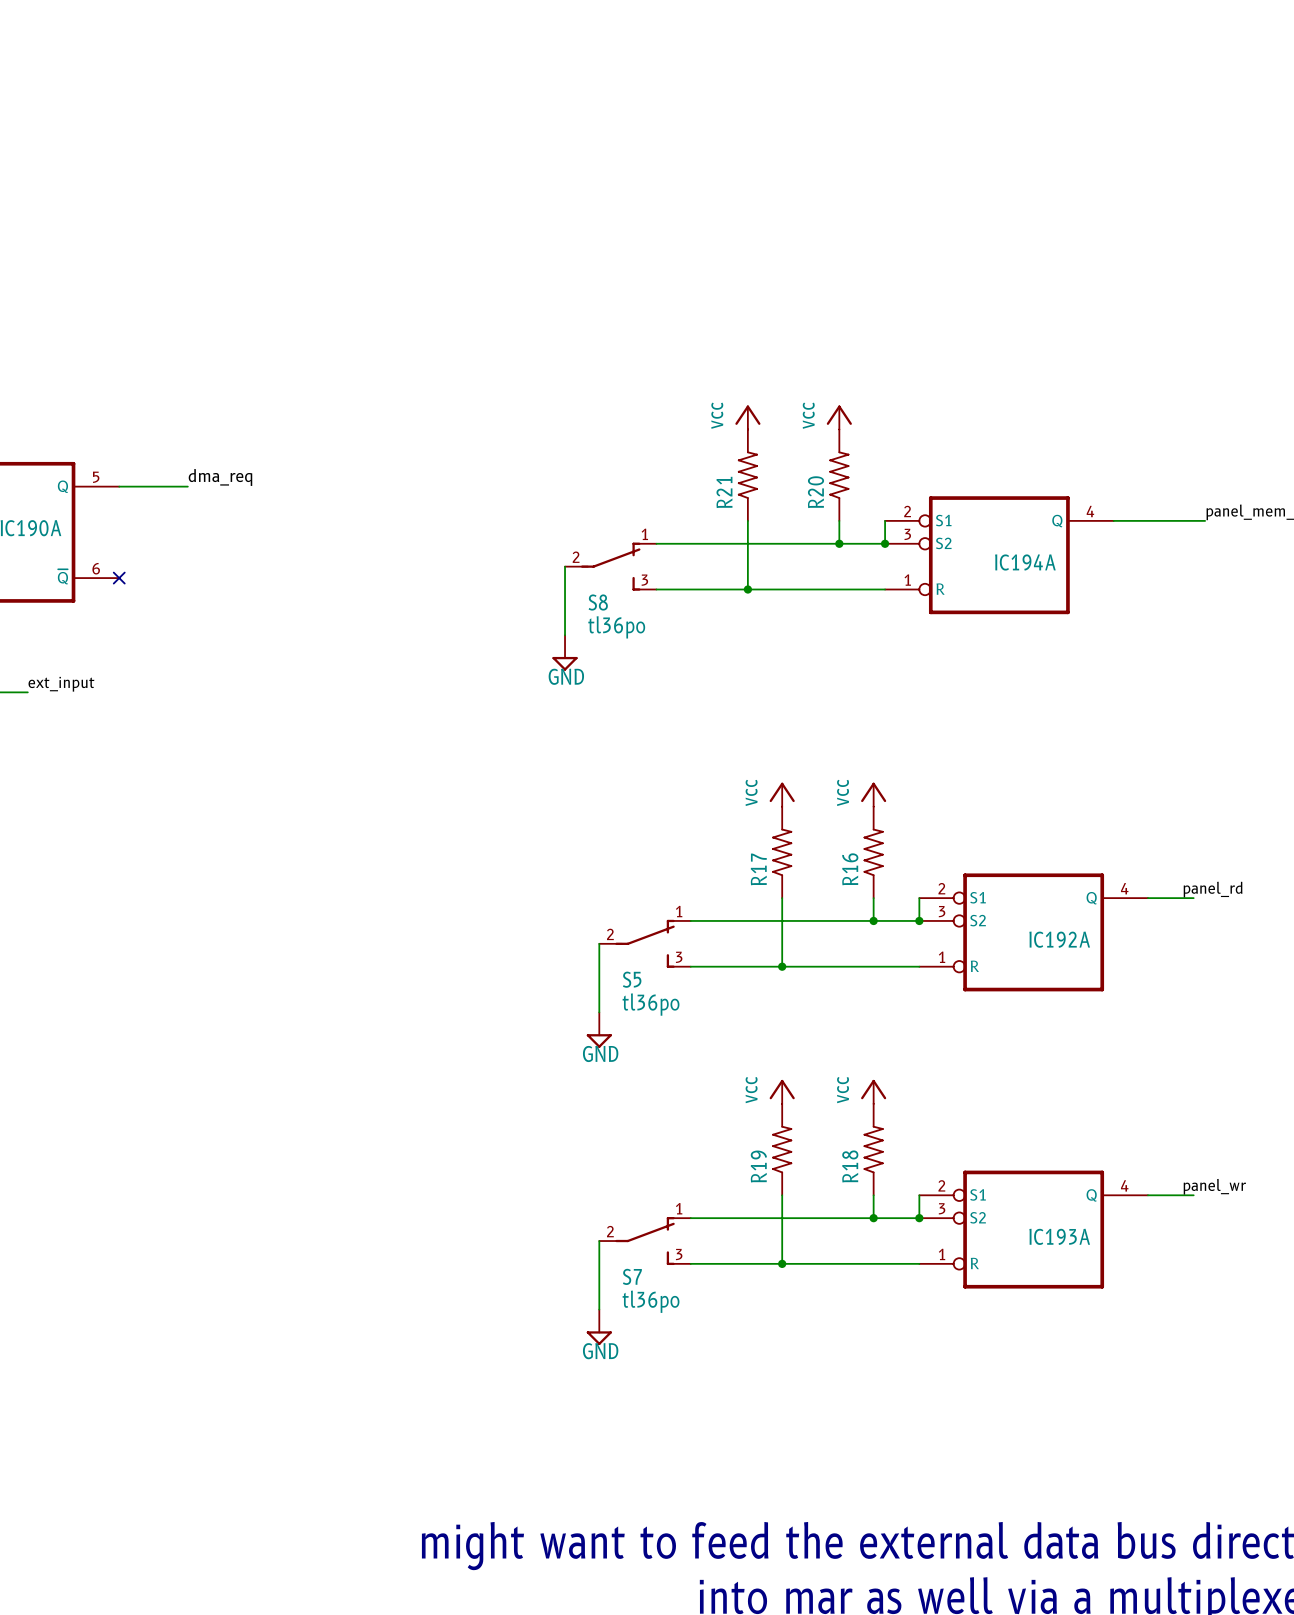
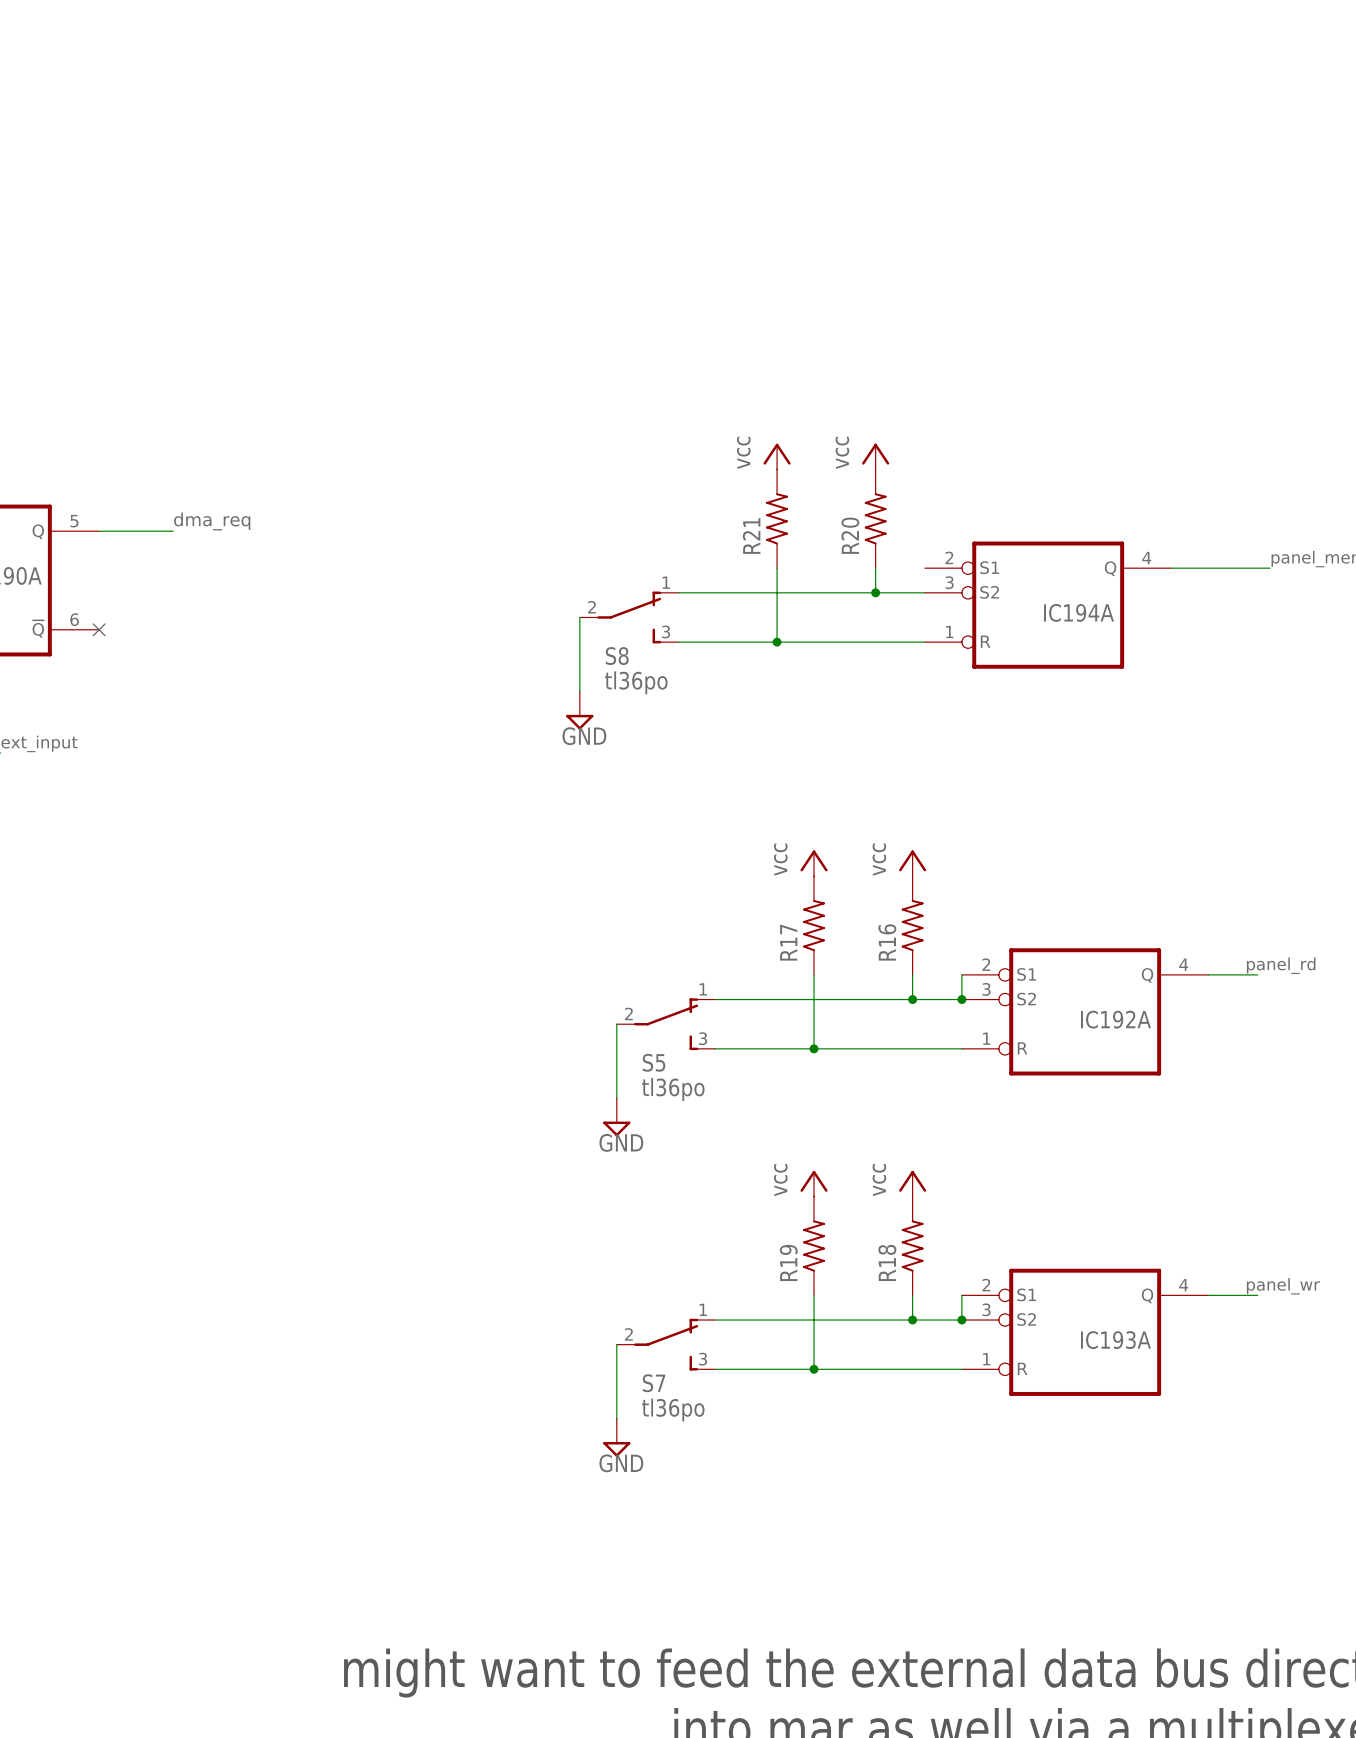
wire: (885, 520) (885, 543) -> none
junction: (885, 543) -> none

